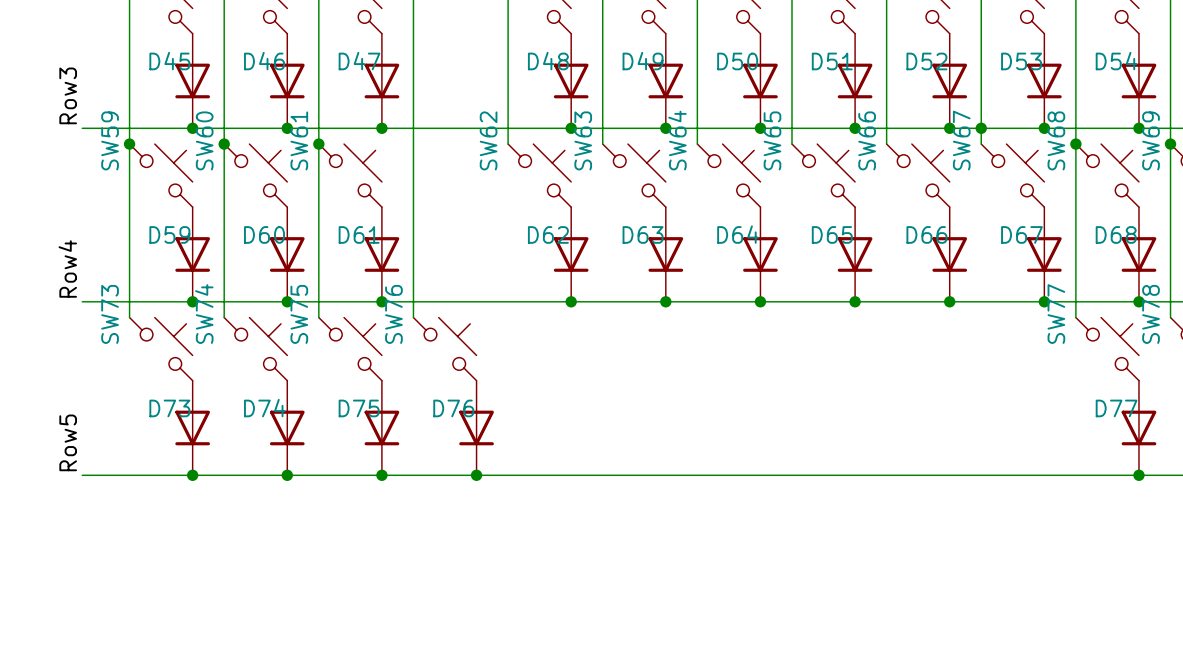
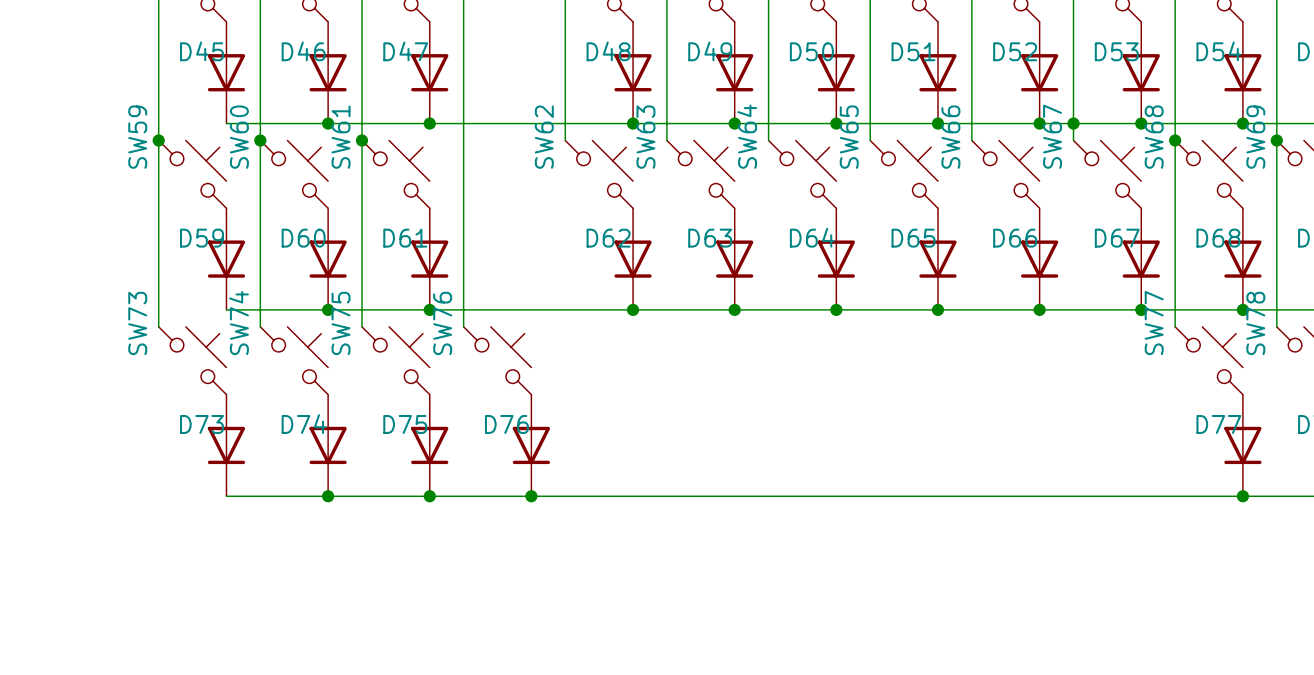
label: Row3 (68, 95) -> none
wire: (82, 128) (192, 128) -> none
junction: (192, 128) -> none
label: Row4 (67, 269) -> none
wire: (82, 301) (192, 301) -> none
junction: (192, 301) -> none
label: Row5 (68, 442) -> none
wire: (82, 475) (192, 475) -> none
junction: (192, 475) -> none

